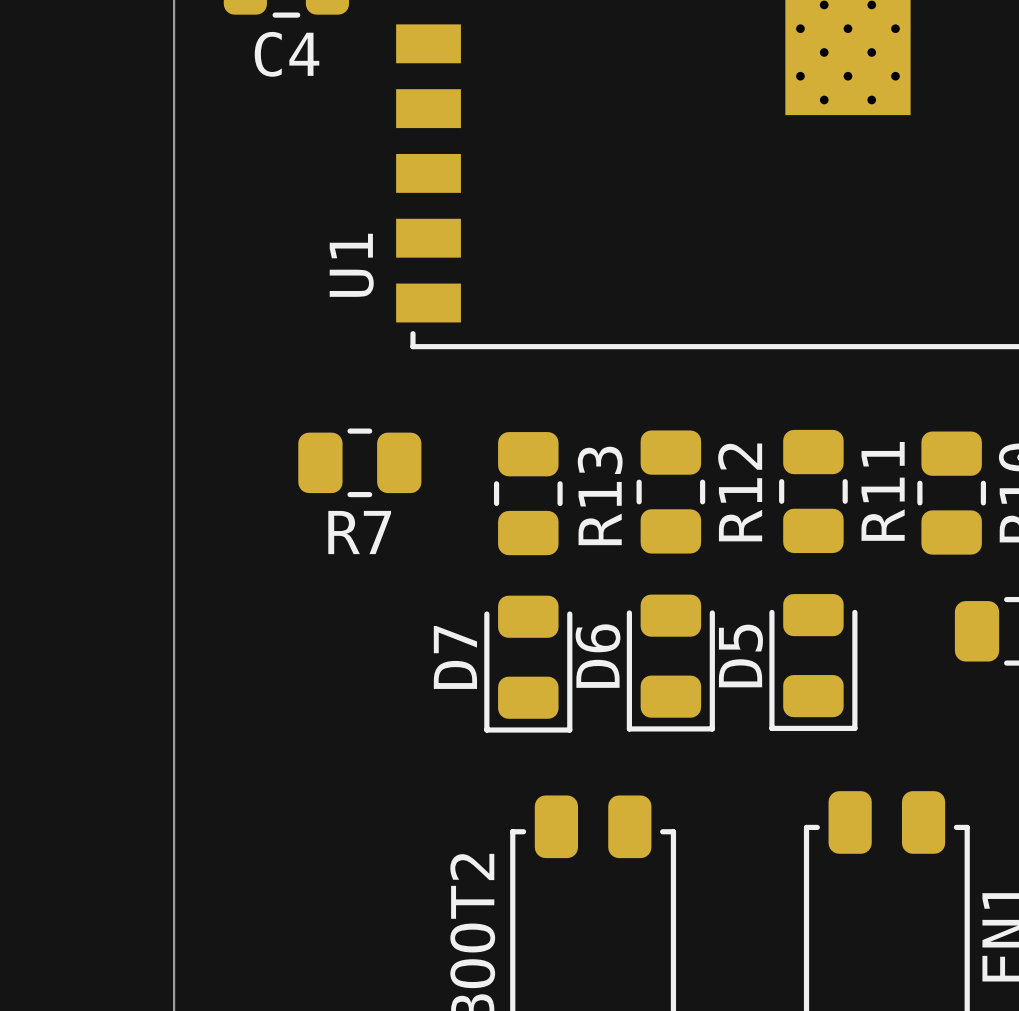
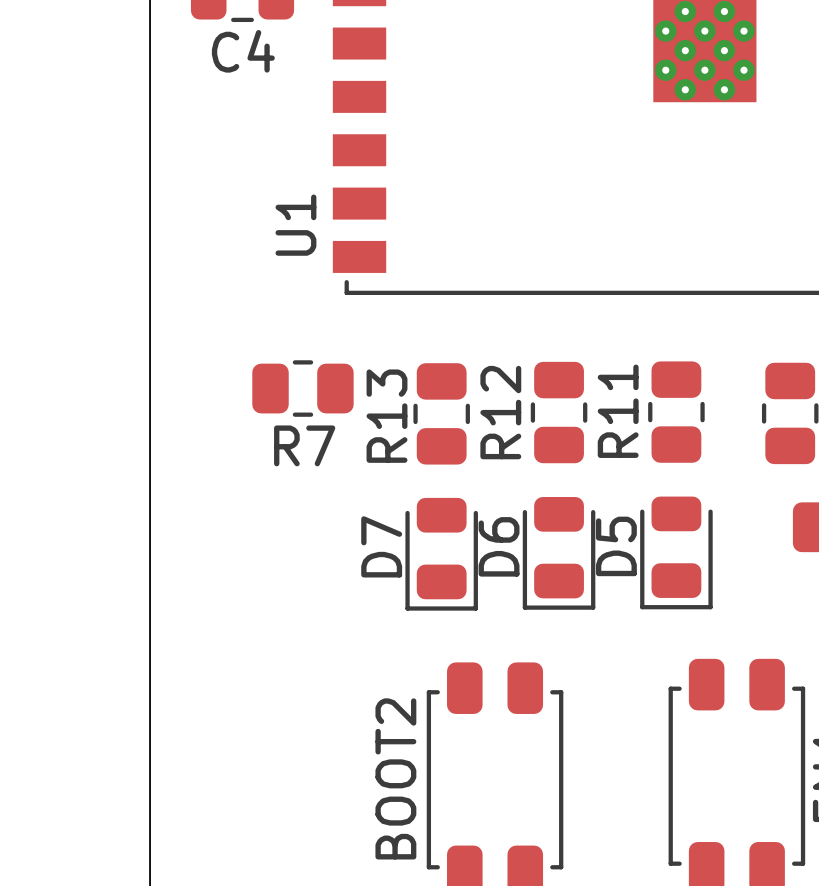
R11 name position: R11 (883, 491) -> R11 (618, 411)
R12 name position: R12 (740, 492) -> R12 (500, 412)
R13 name position: R13 (600, 495) -> R13 (387, 416)

